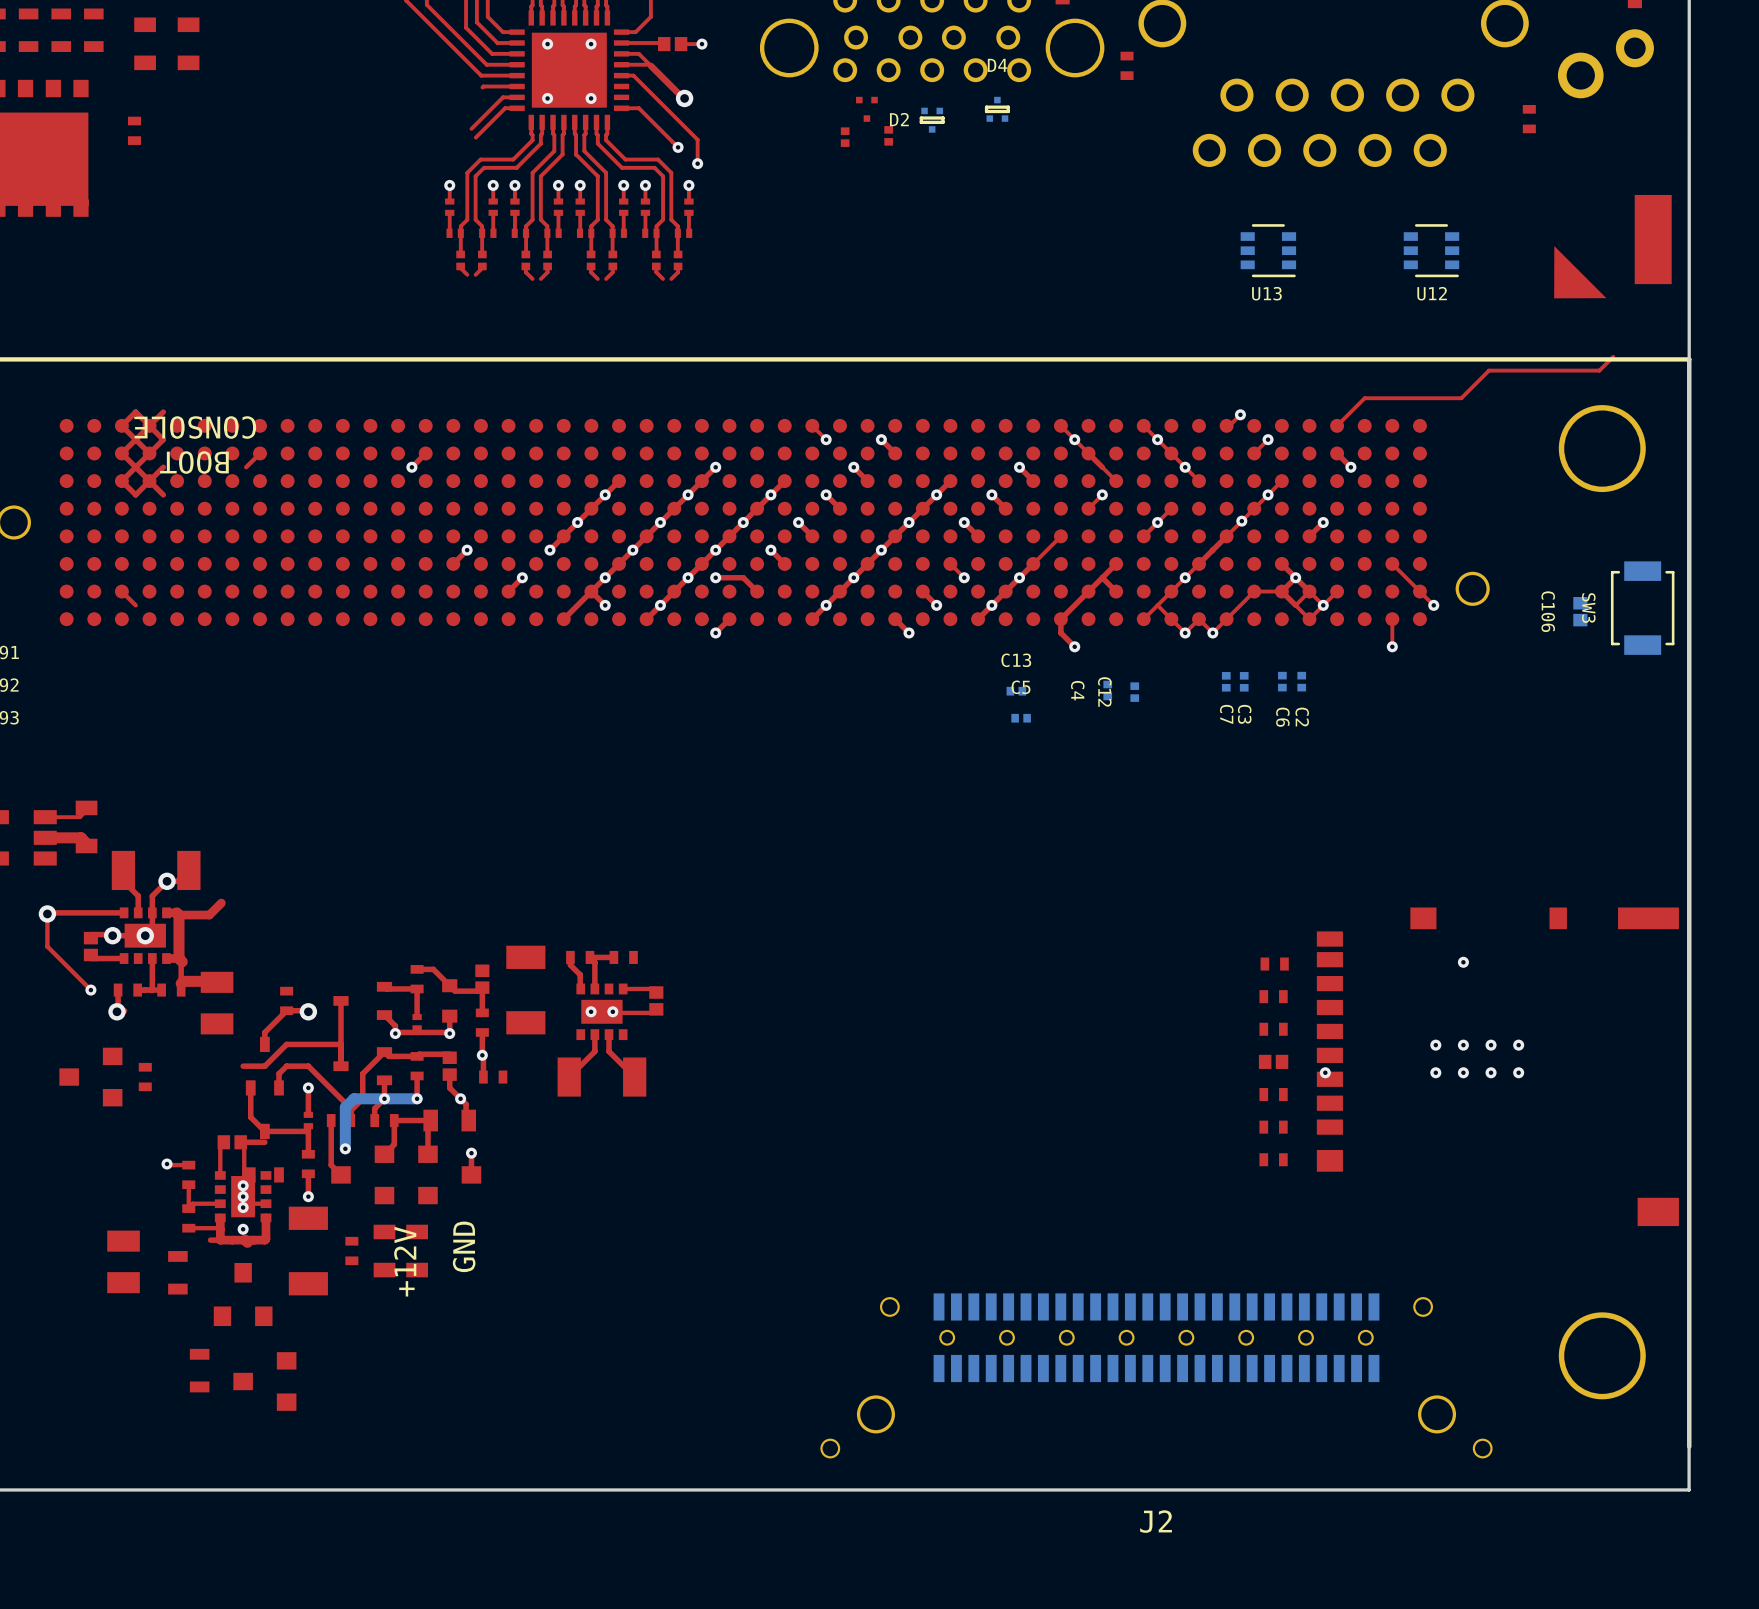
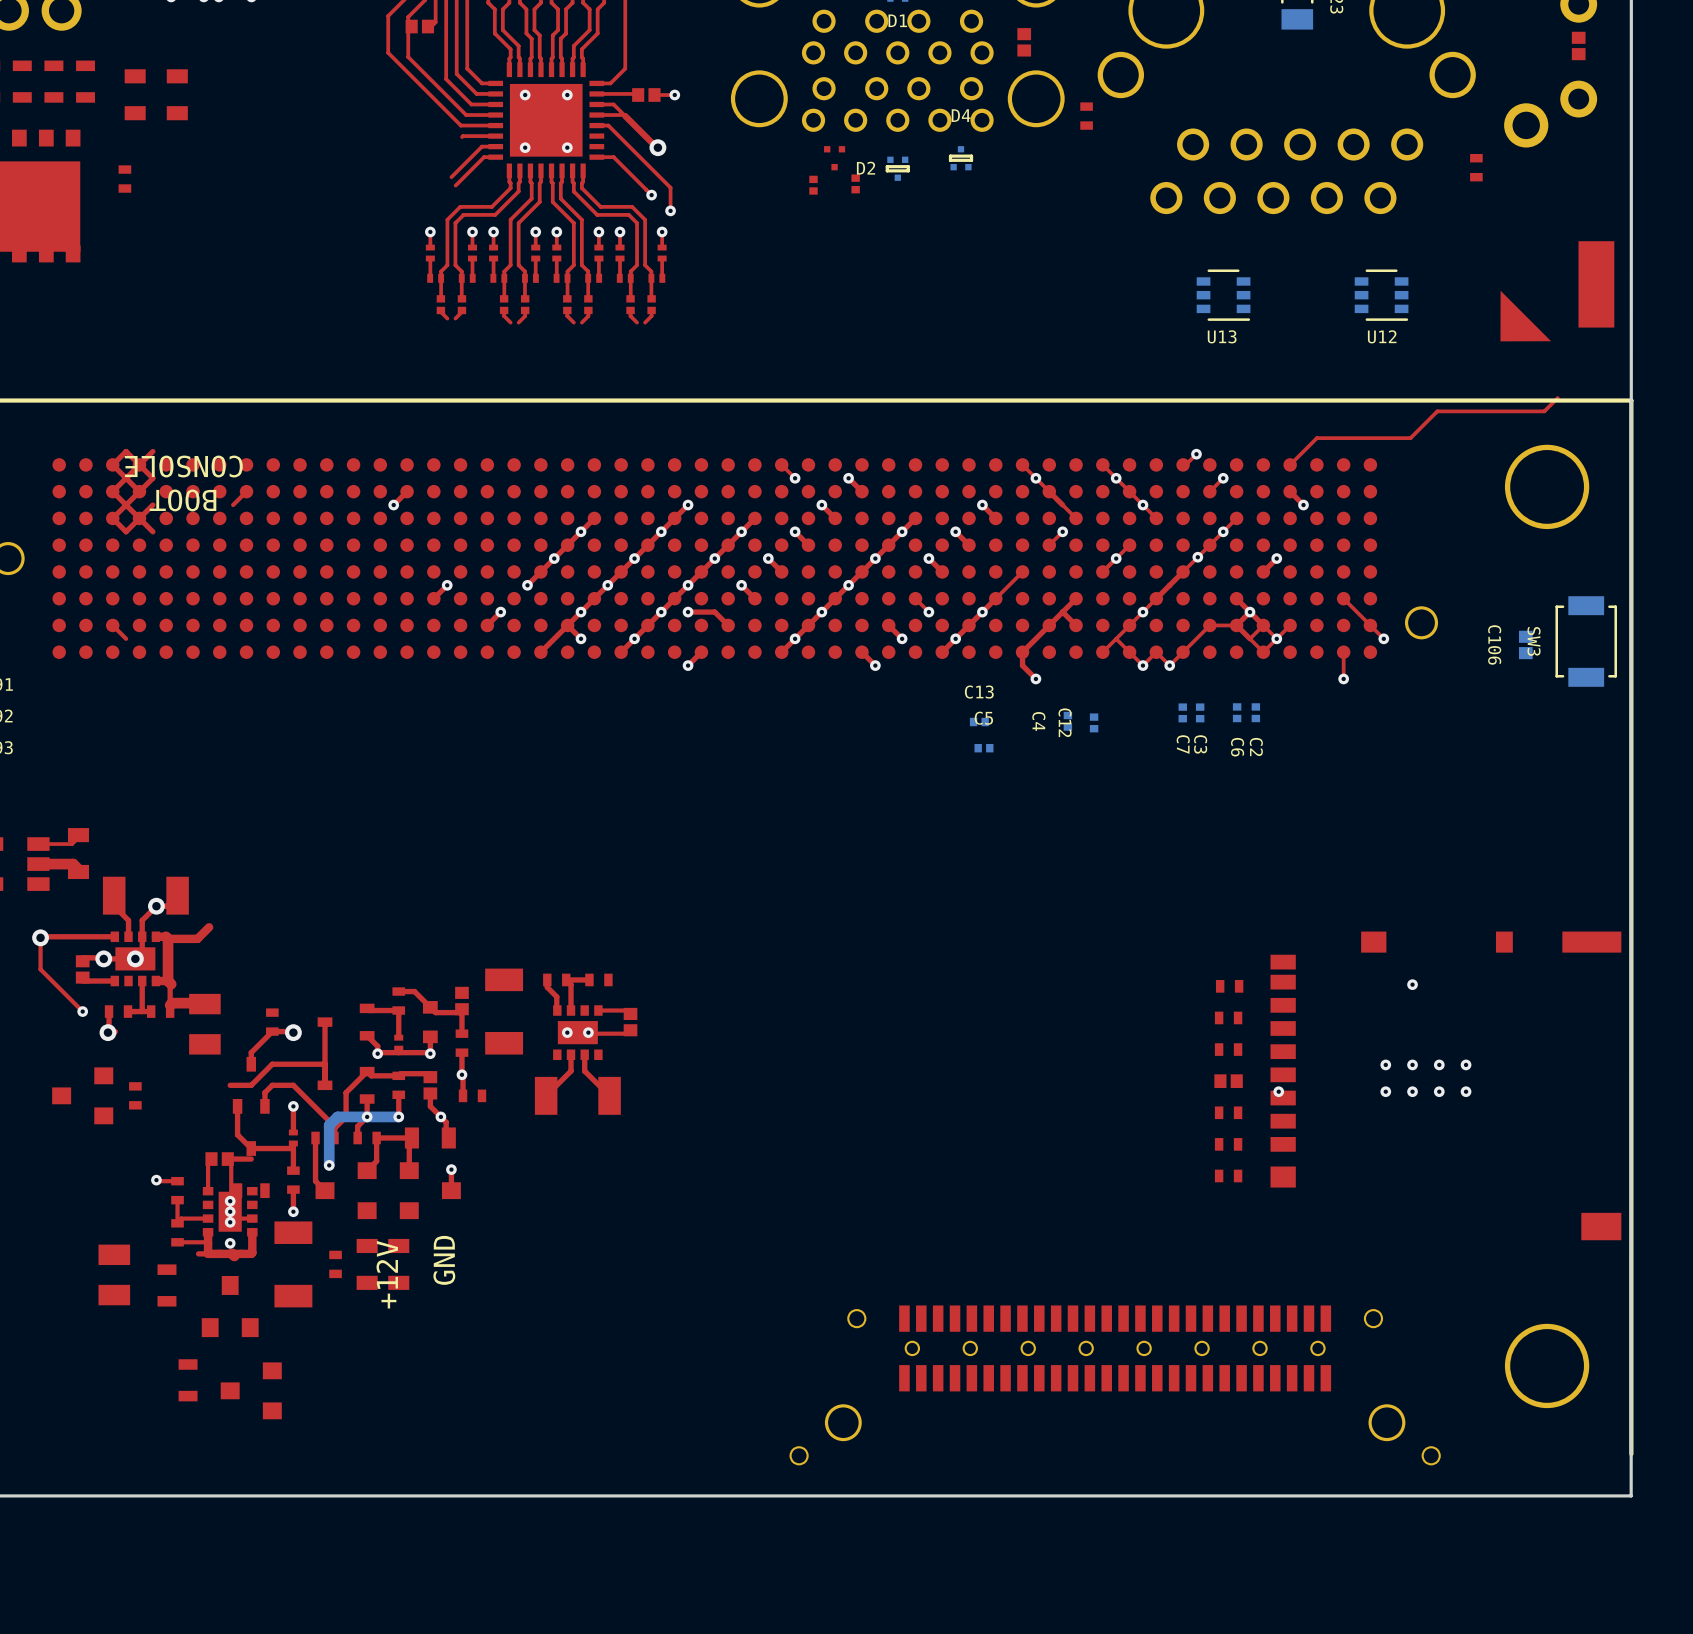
J2 side: bottom (1156, 1375) -> top (1115, 1385)

